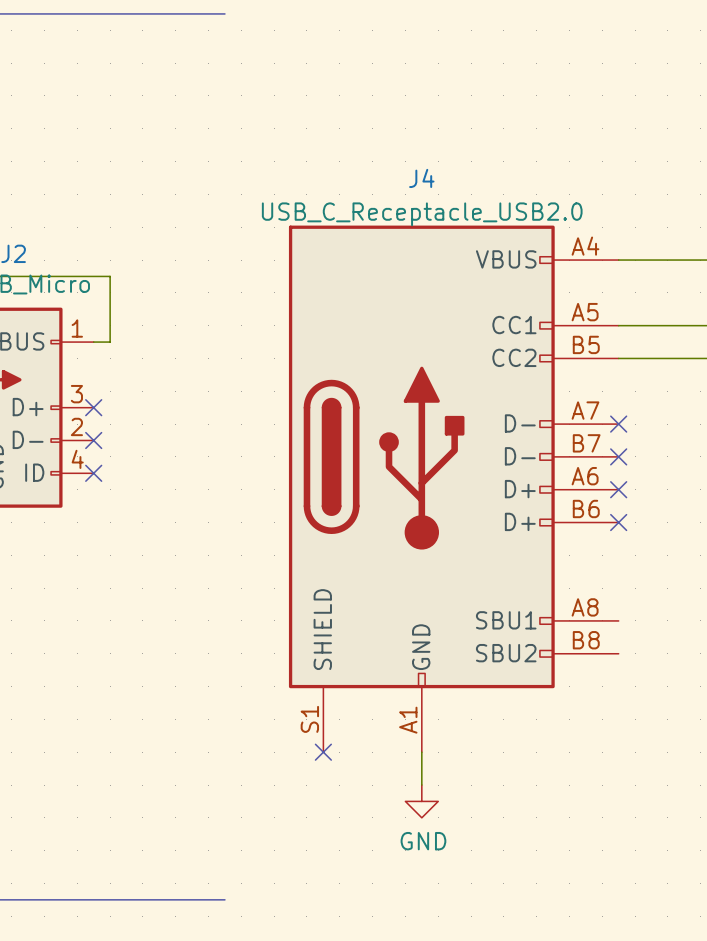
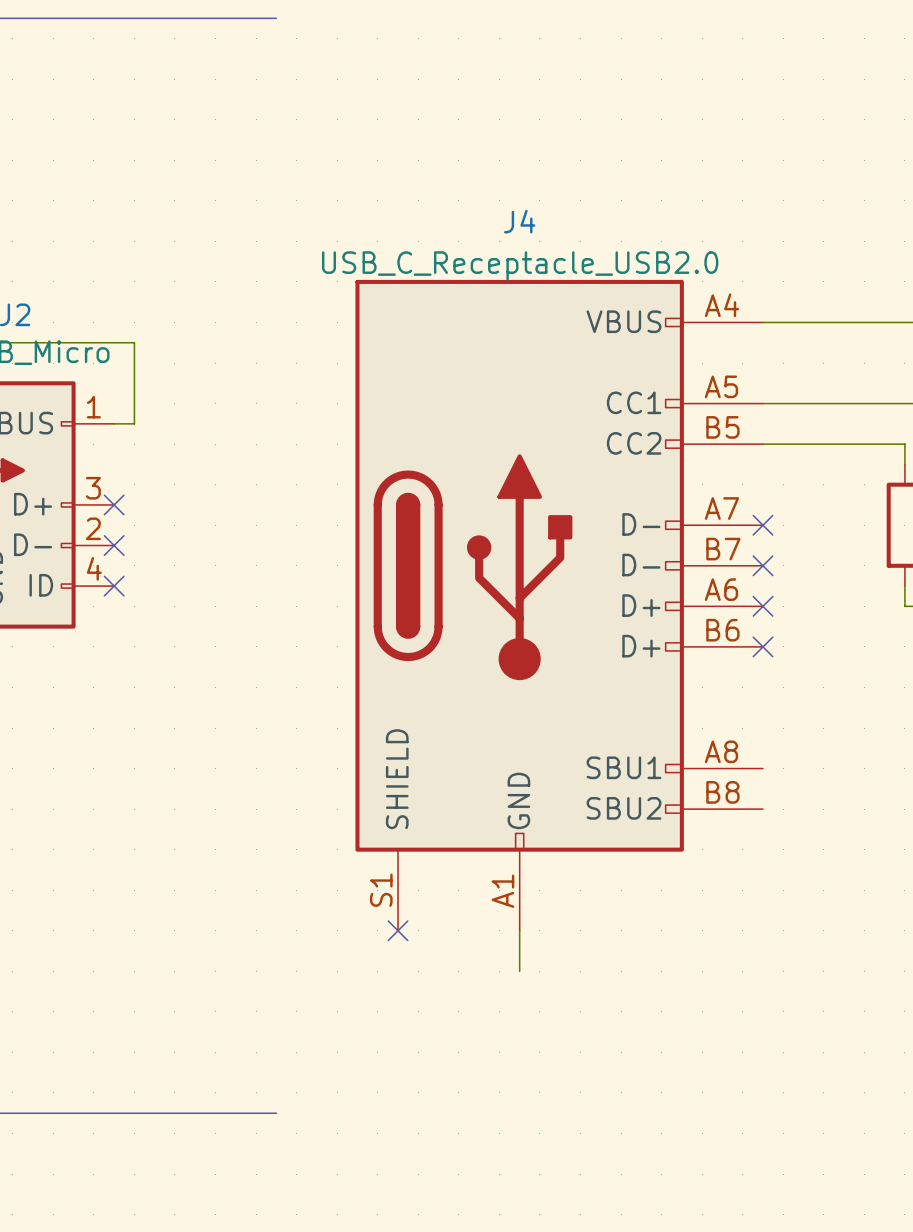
power symbol: GND (421, 801) -> none

